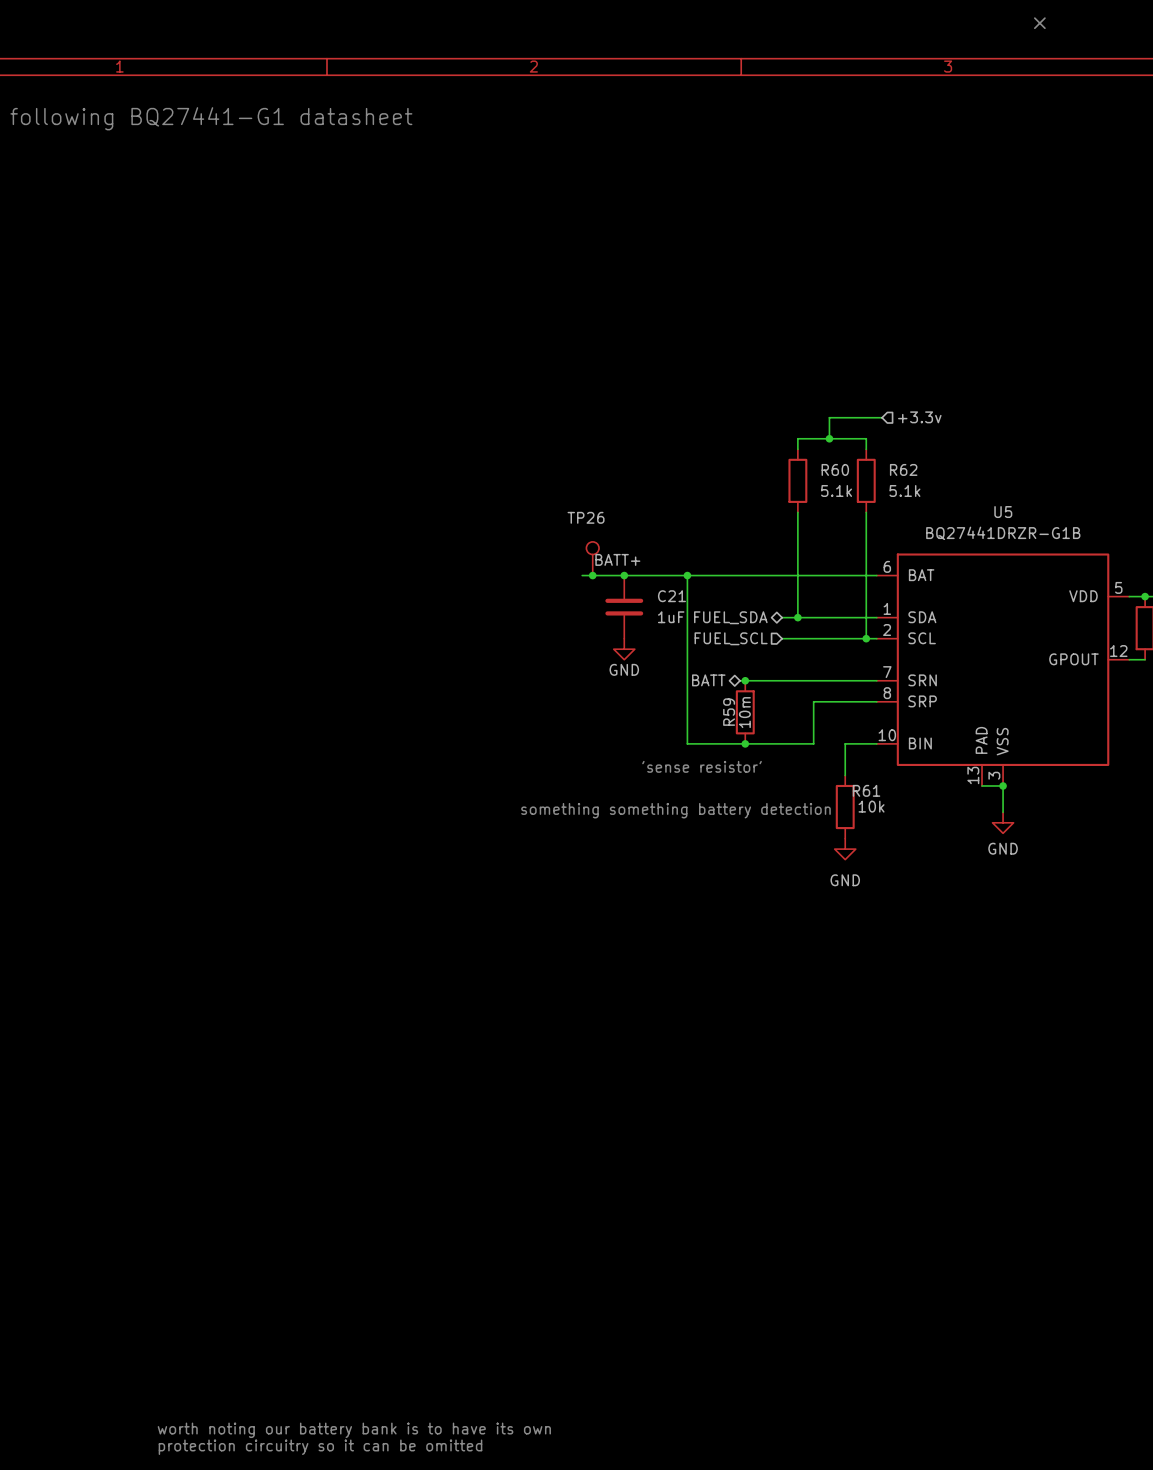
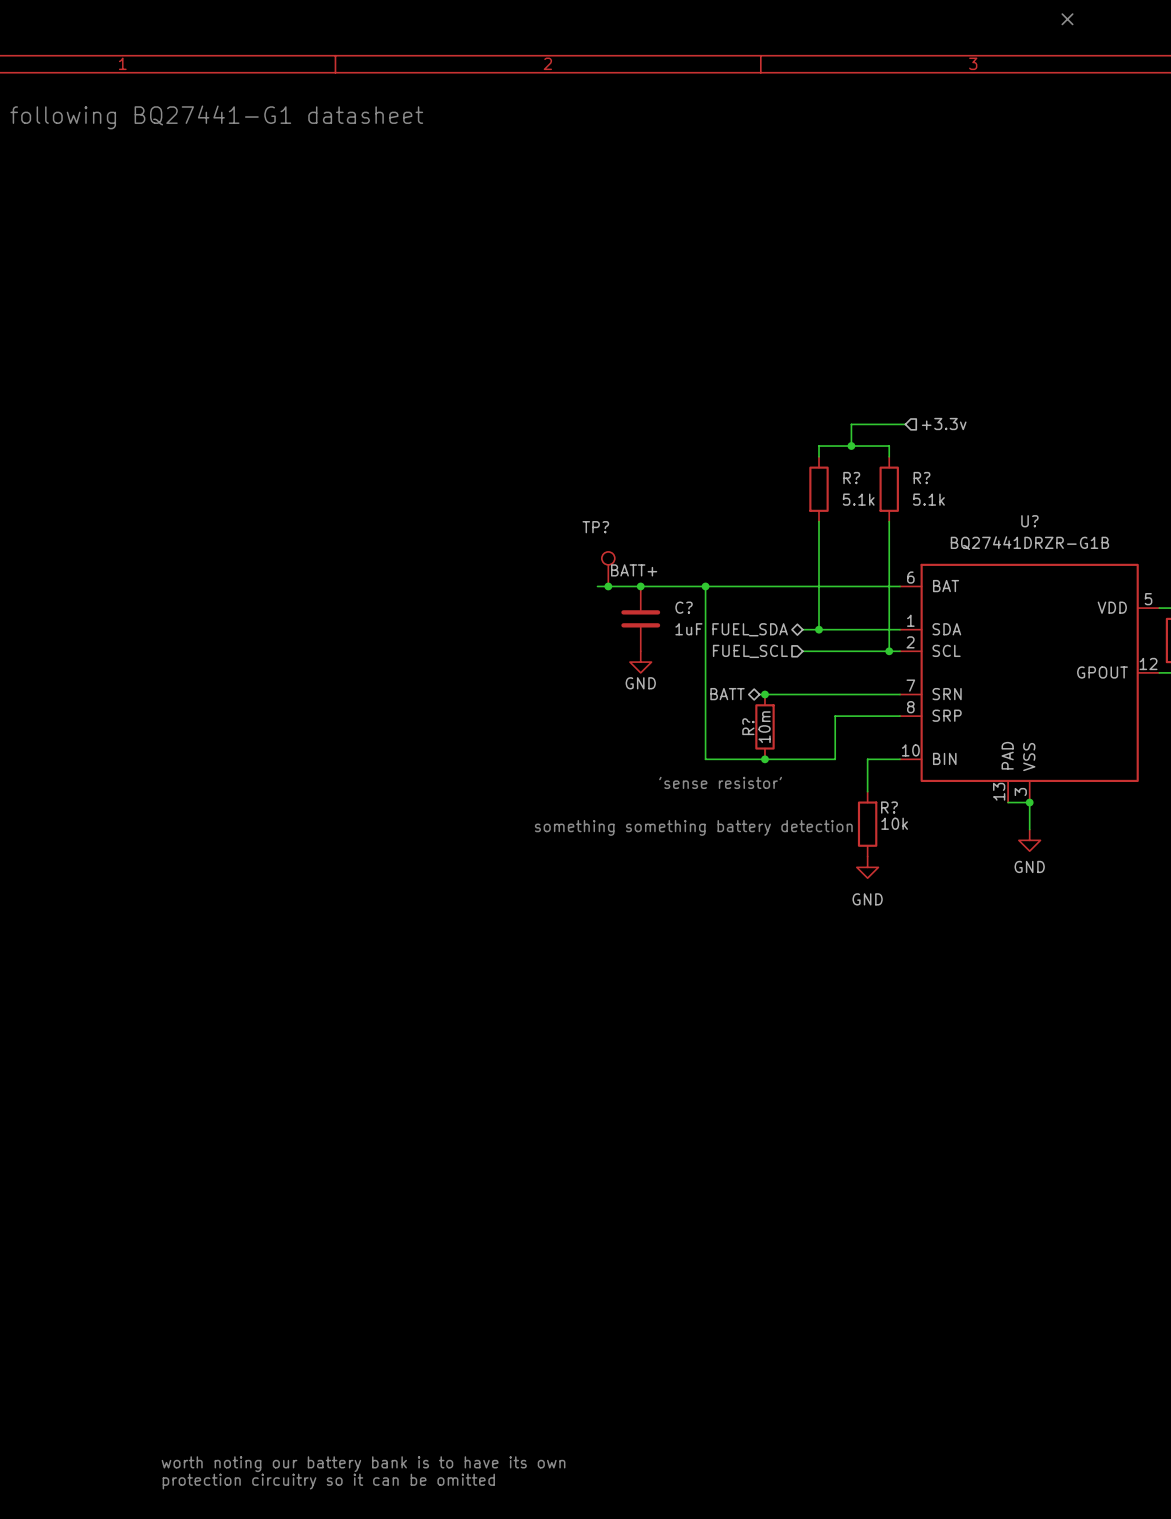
R60 name: R60 (835, 469) -> R? (851, 478)
R62 name: R62 (903, 469) -> R? (921, 478)
U5 name: U5 (1003, 512) -> U? (1029, 521)
TP26 name: TP26 (586, 517) -> TP? (595, 527)
C21 name: C21 (671, 596) -> C? (684, 607)
R59 name: R59 (729, 712) -> R? (748, 726)
R61 name: R61 (866, 790) -> R? (889, 807)

